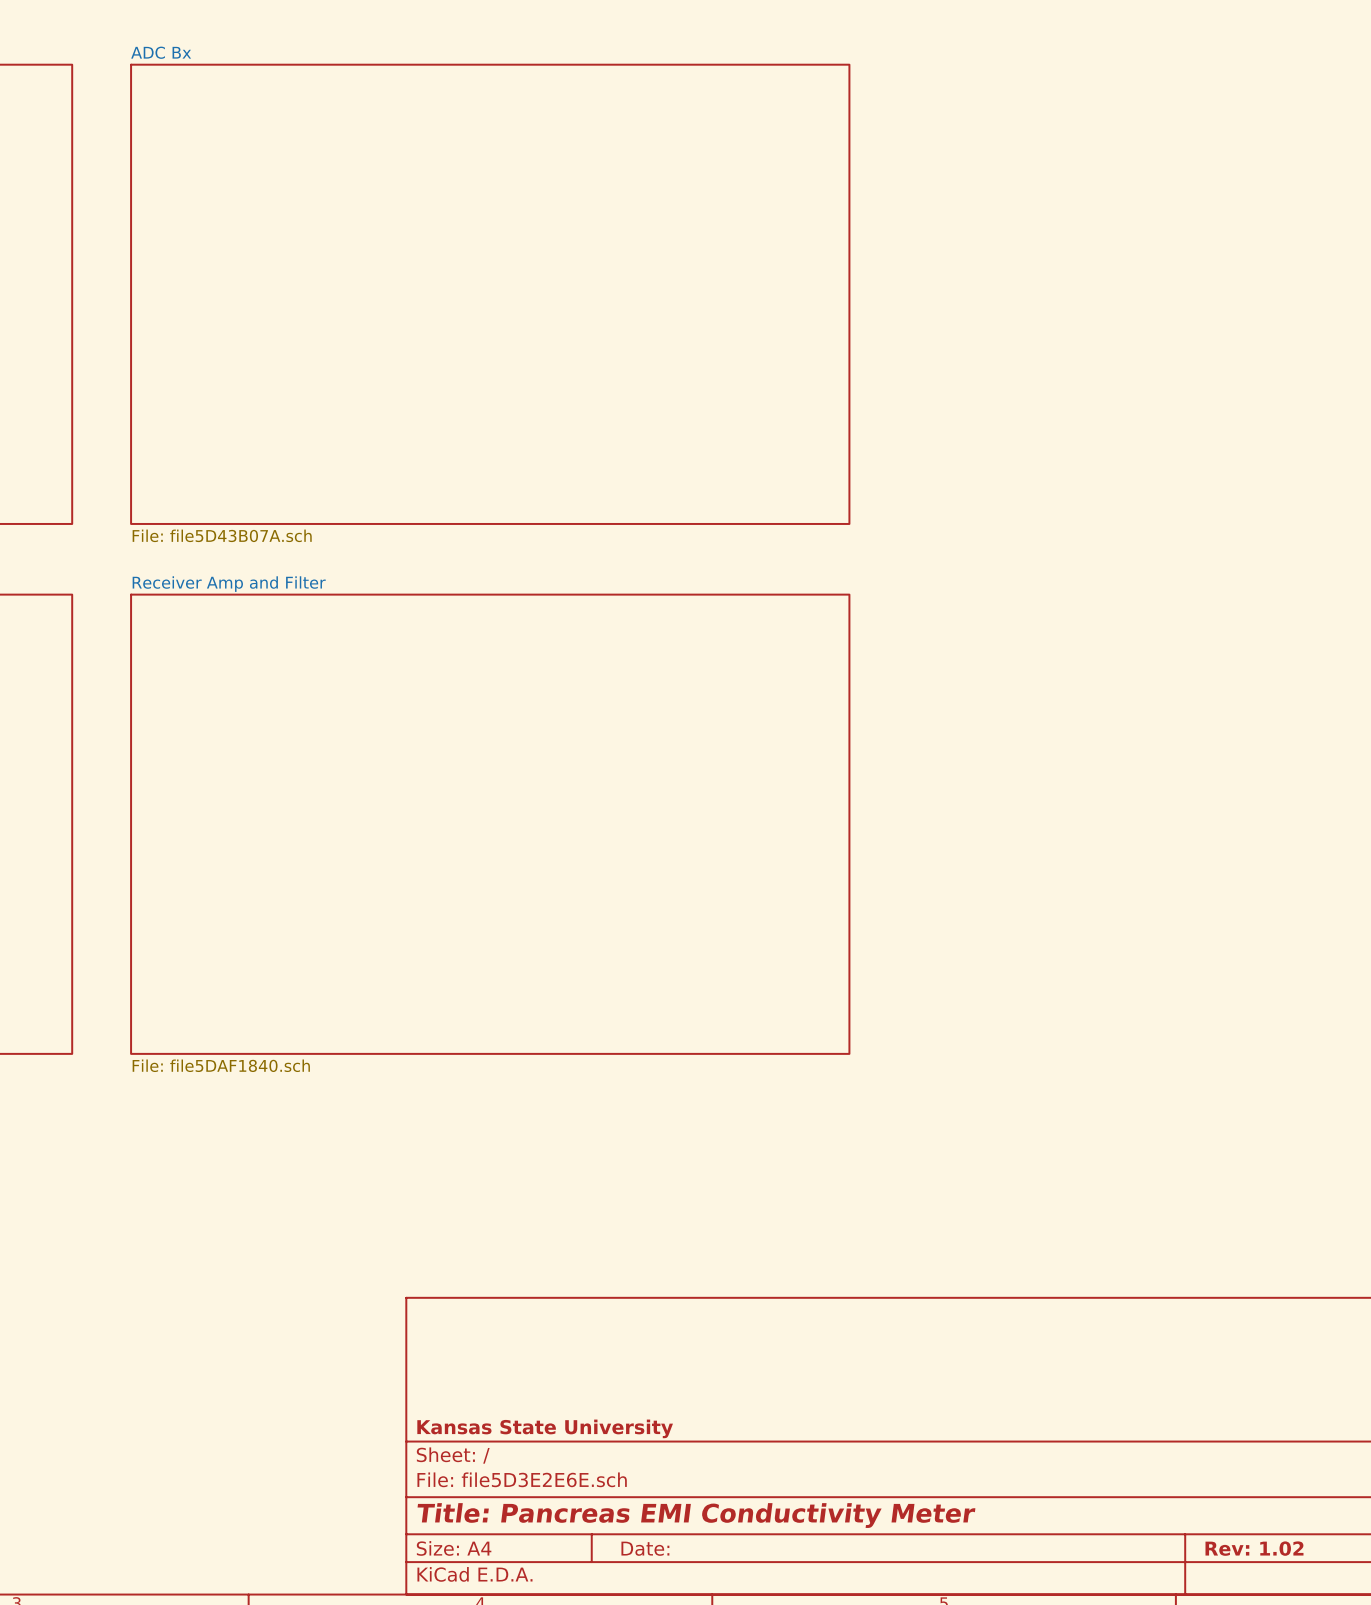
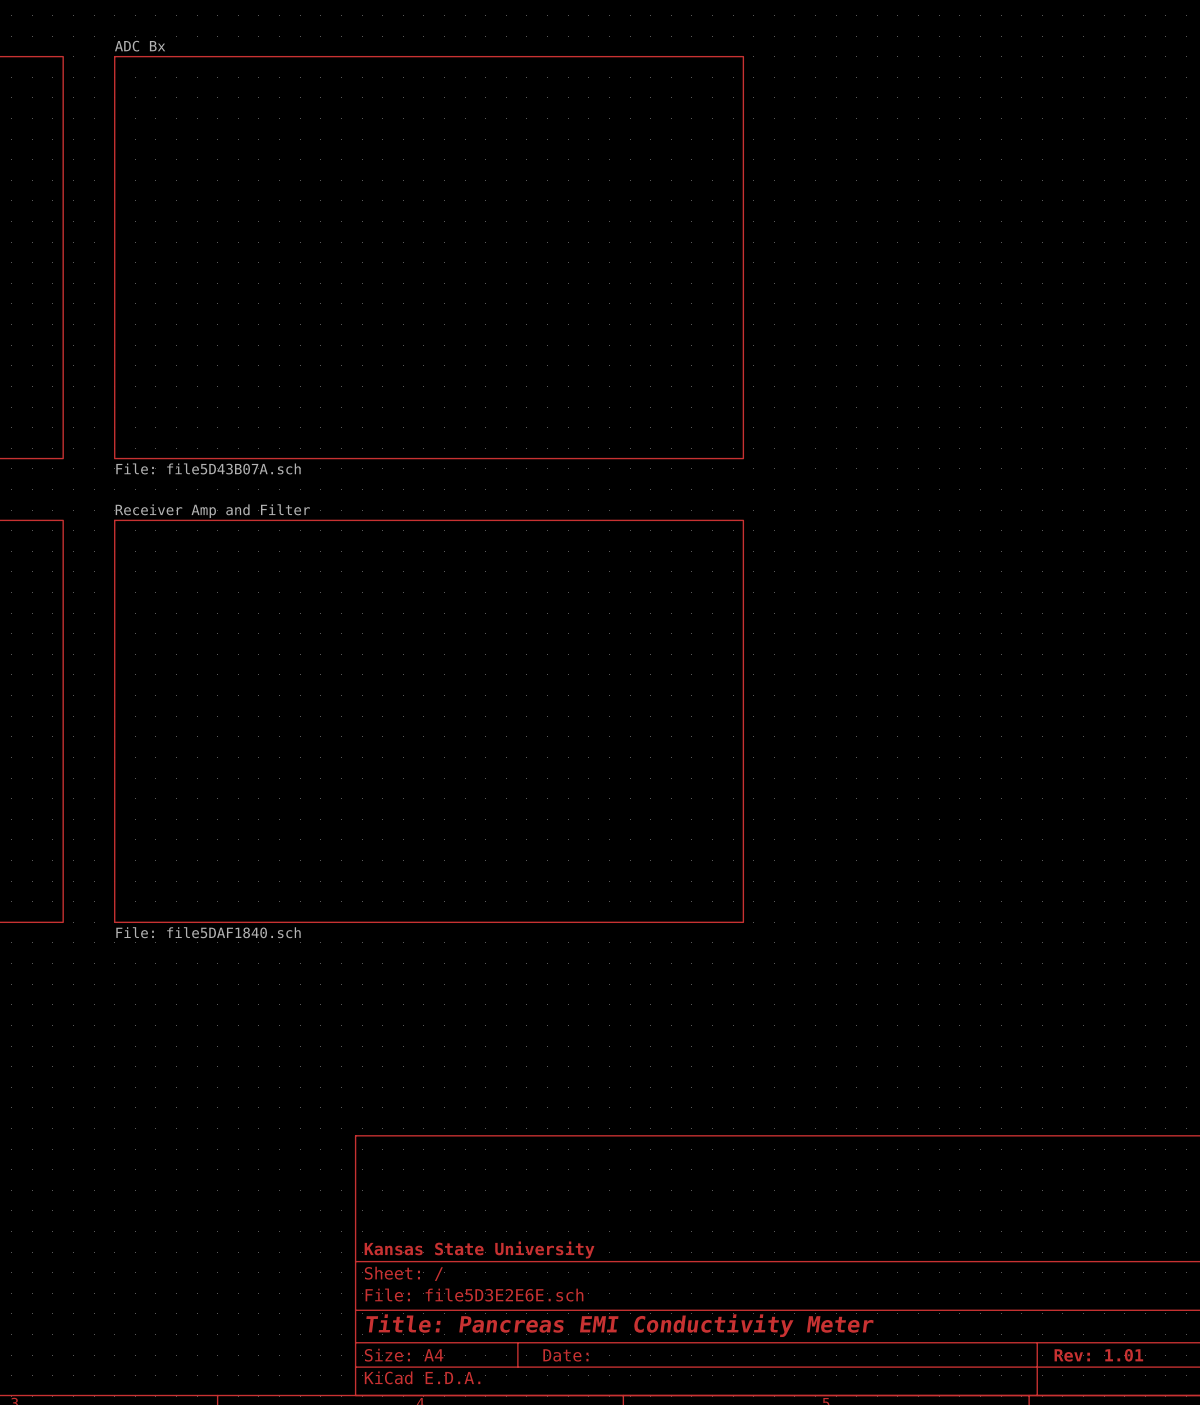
title block: Rev: 1.02 (1254, 1548) -> Rev: 1.01 (1098, 1355)

